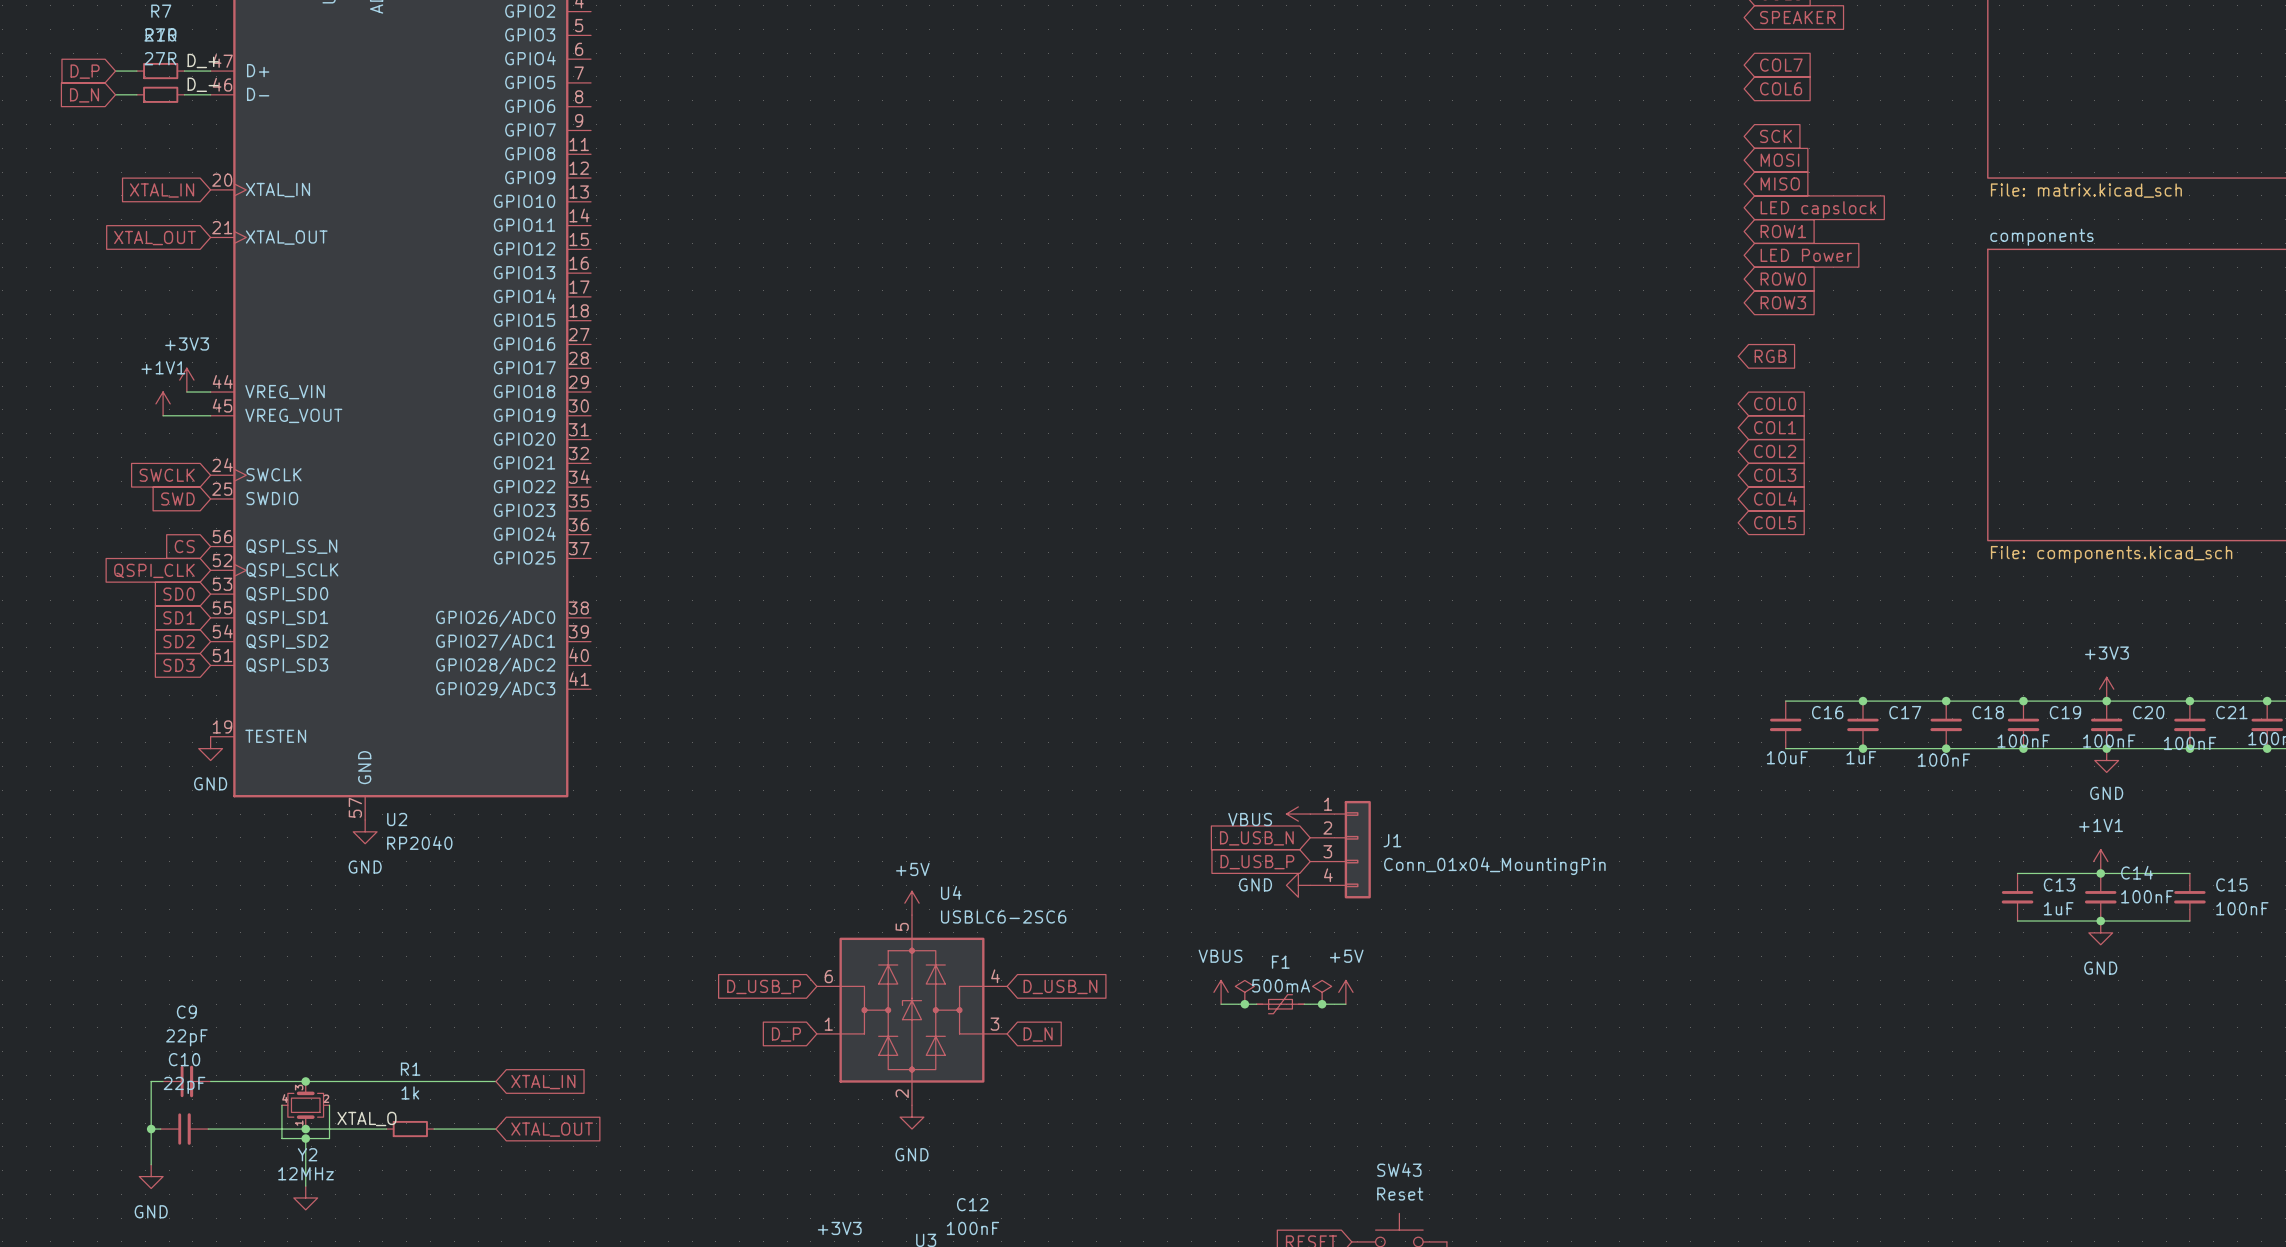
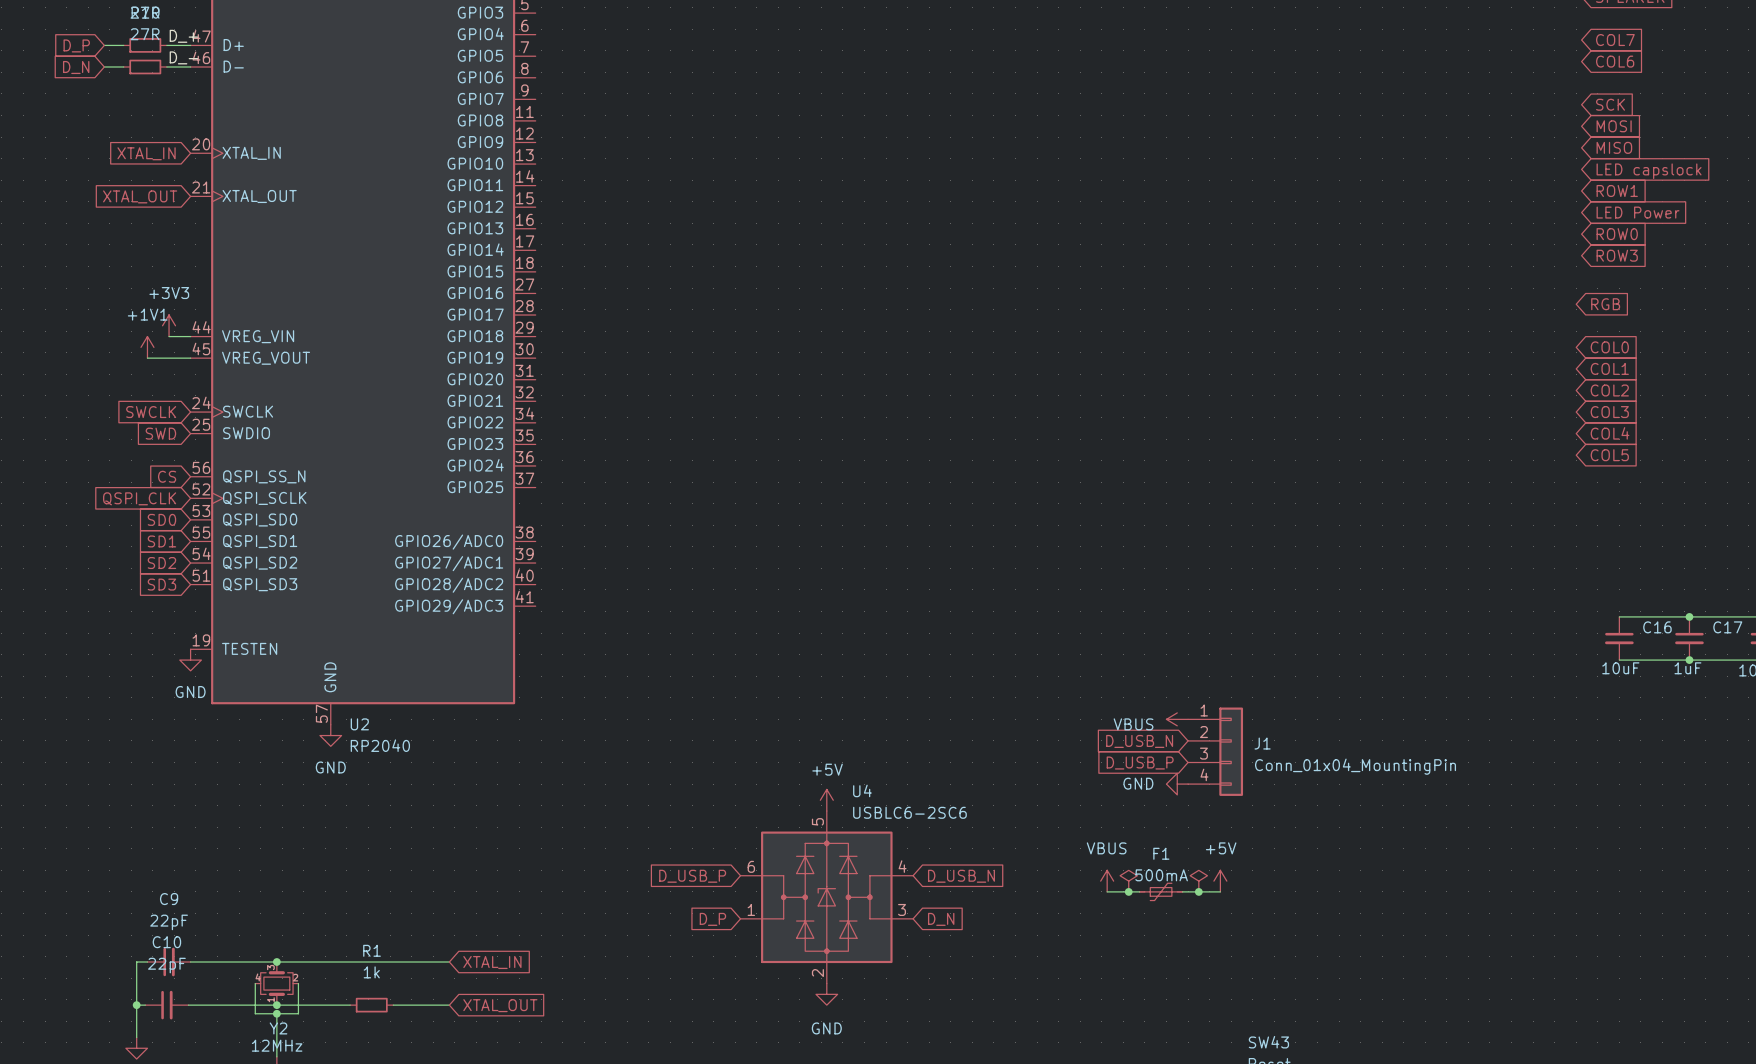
label: XTAL_O (366, 1118) -> none

